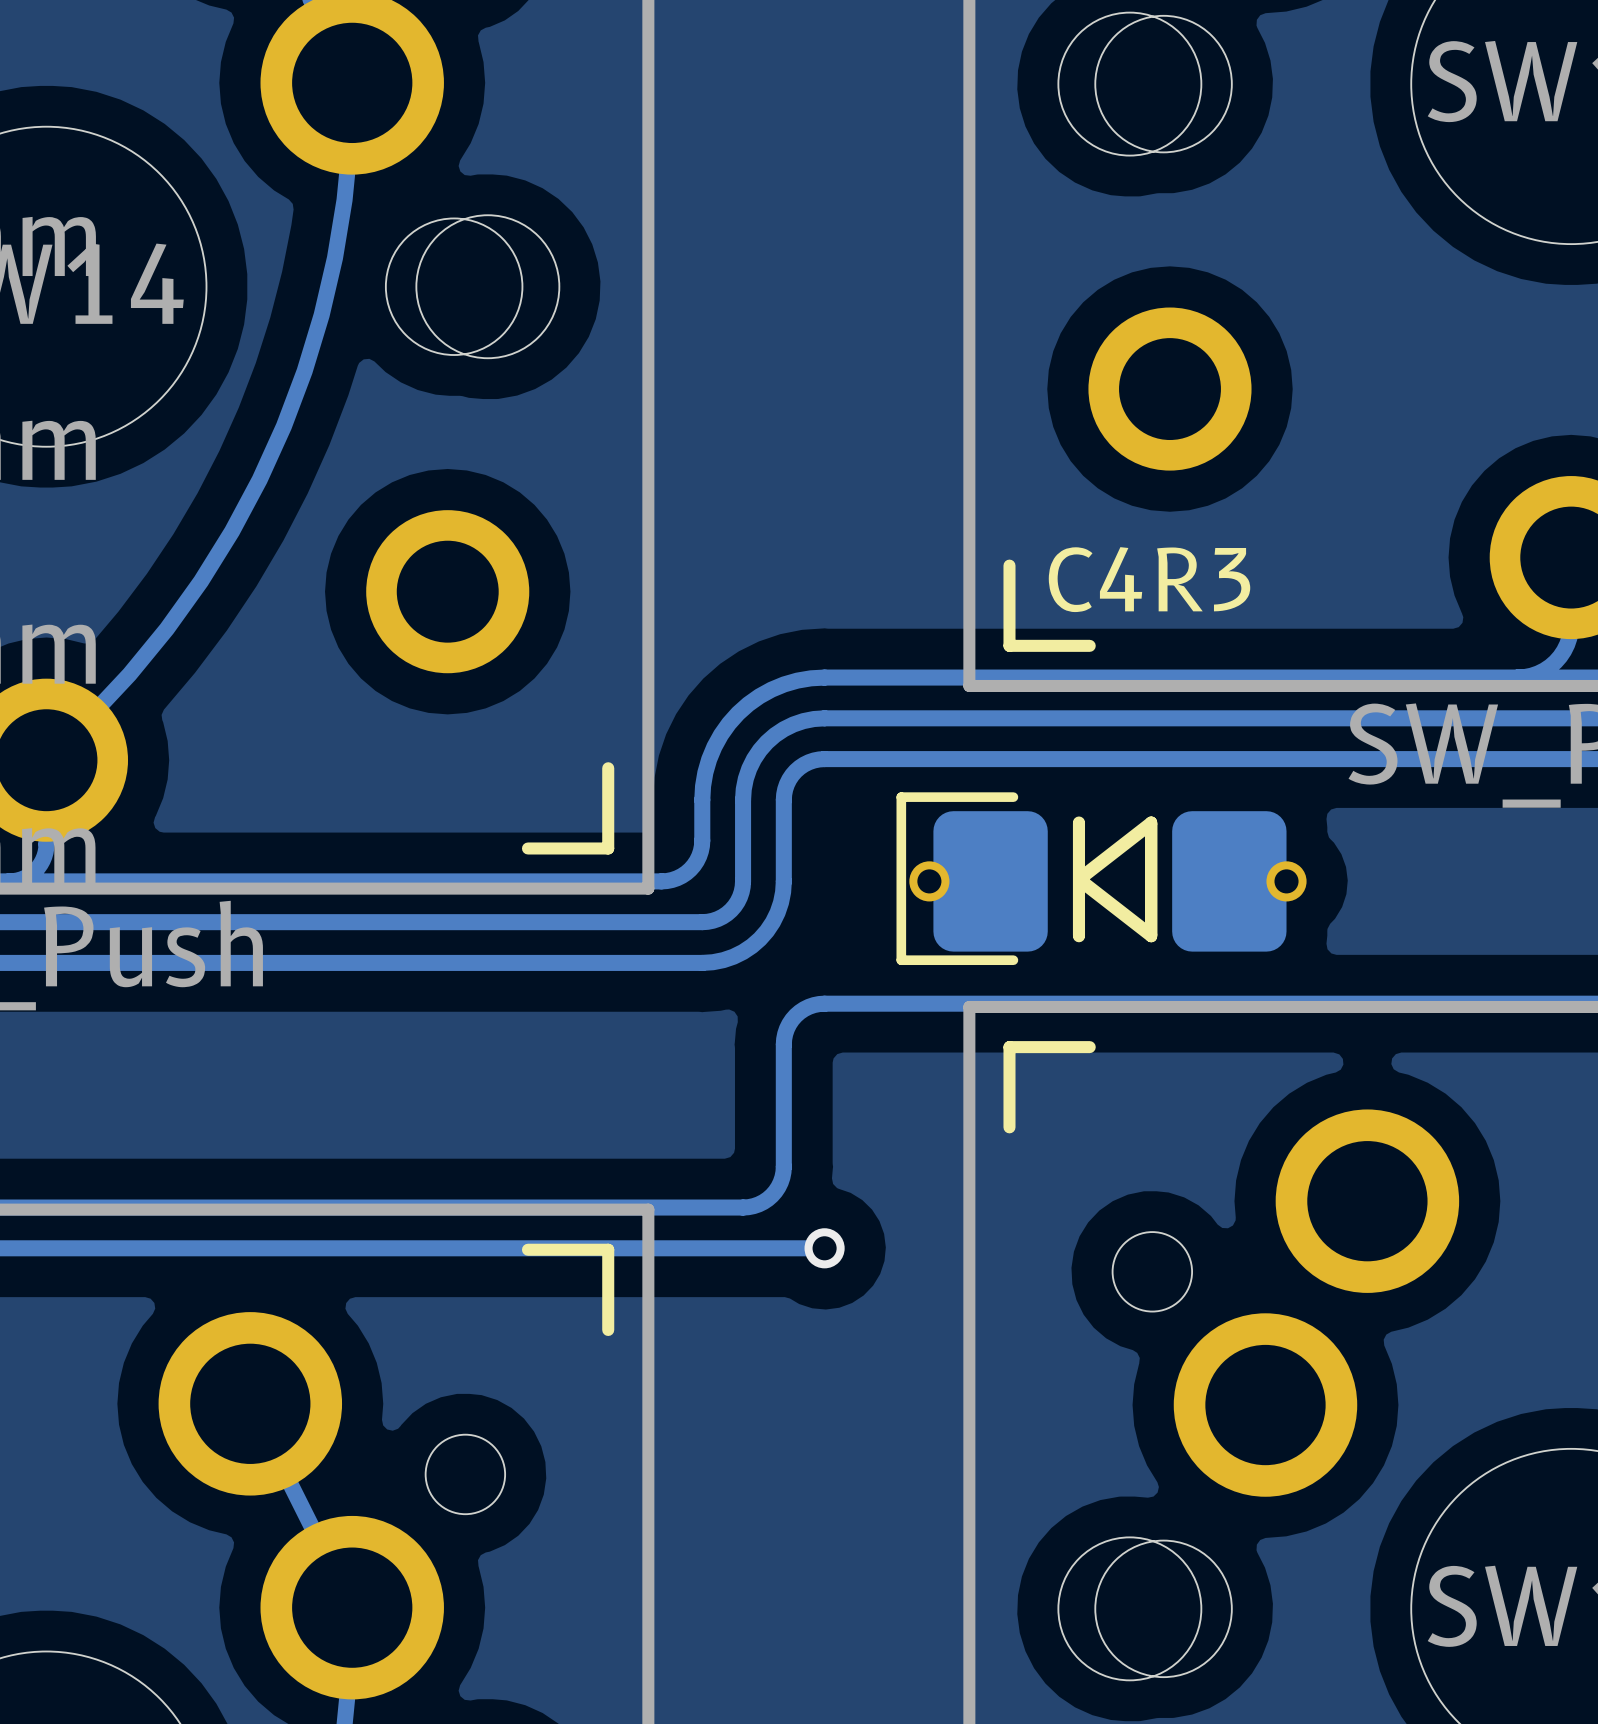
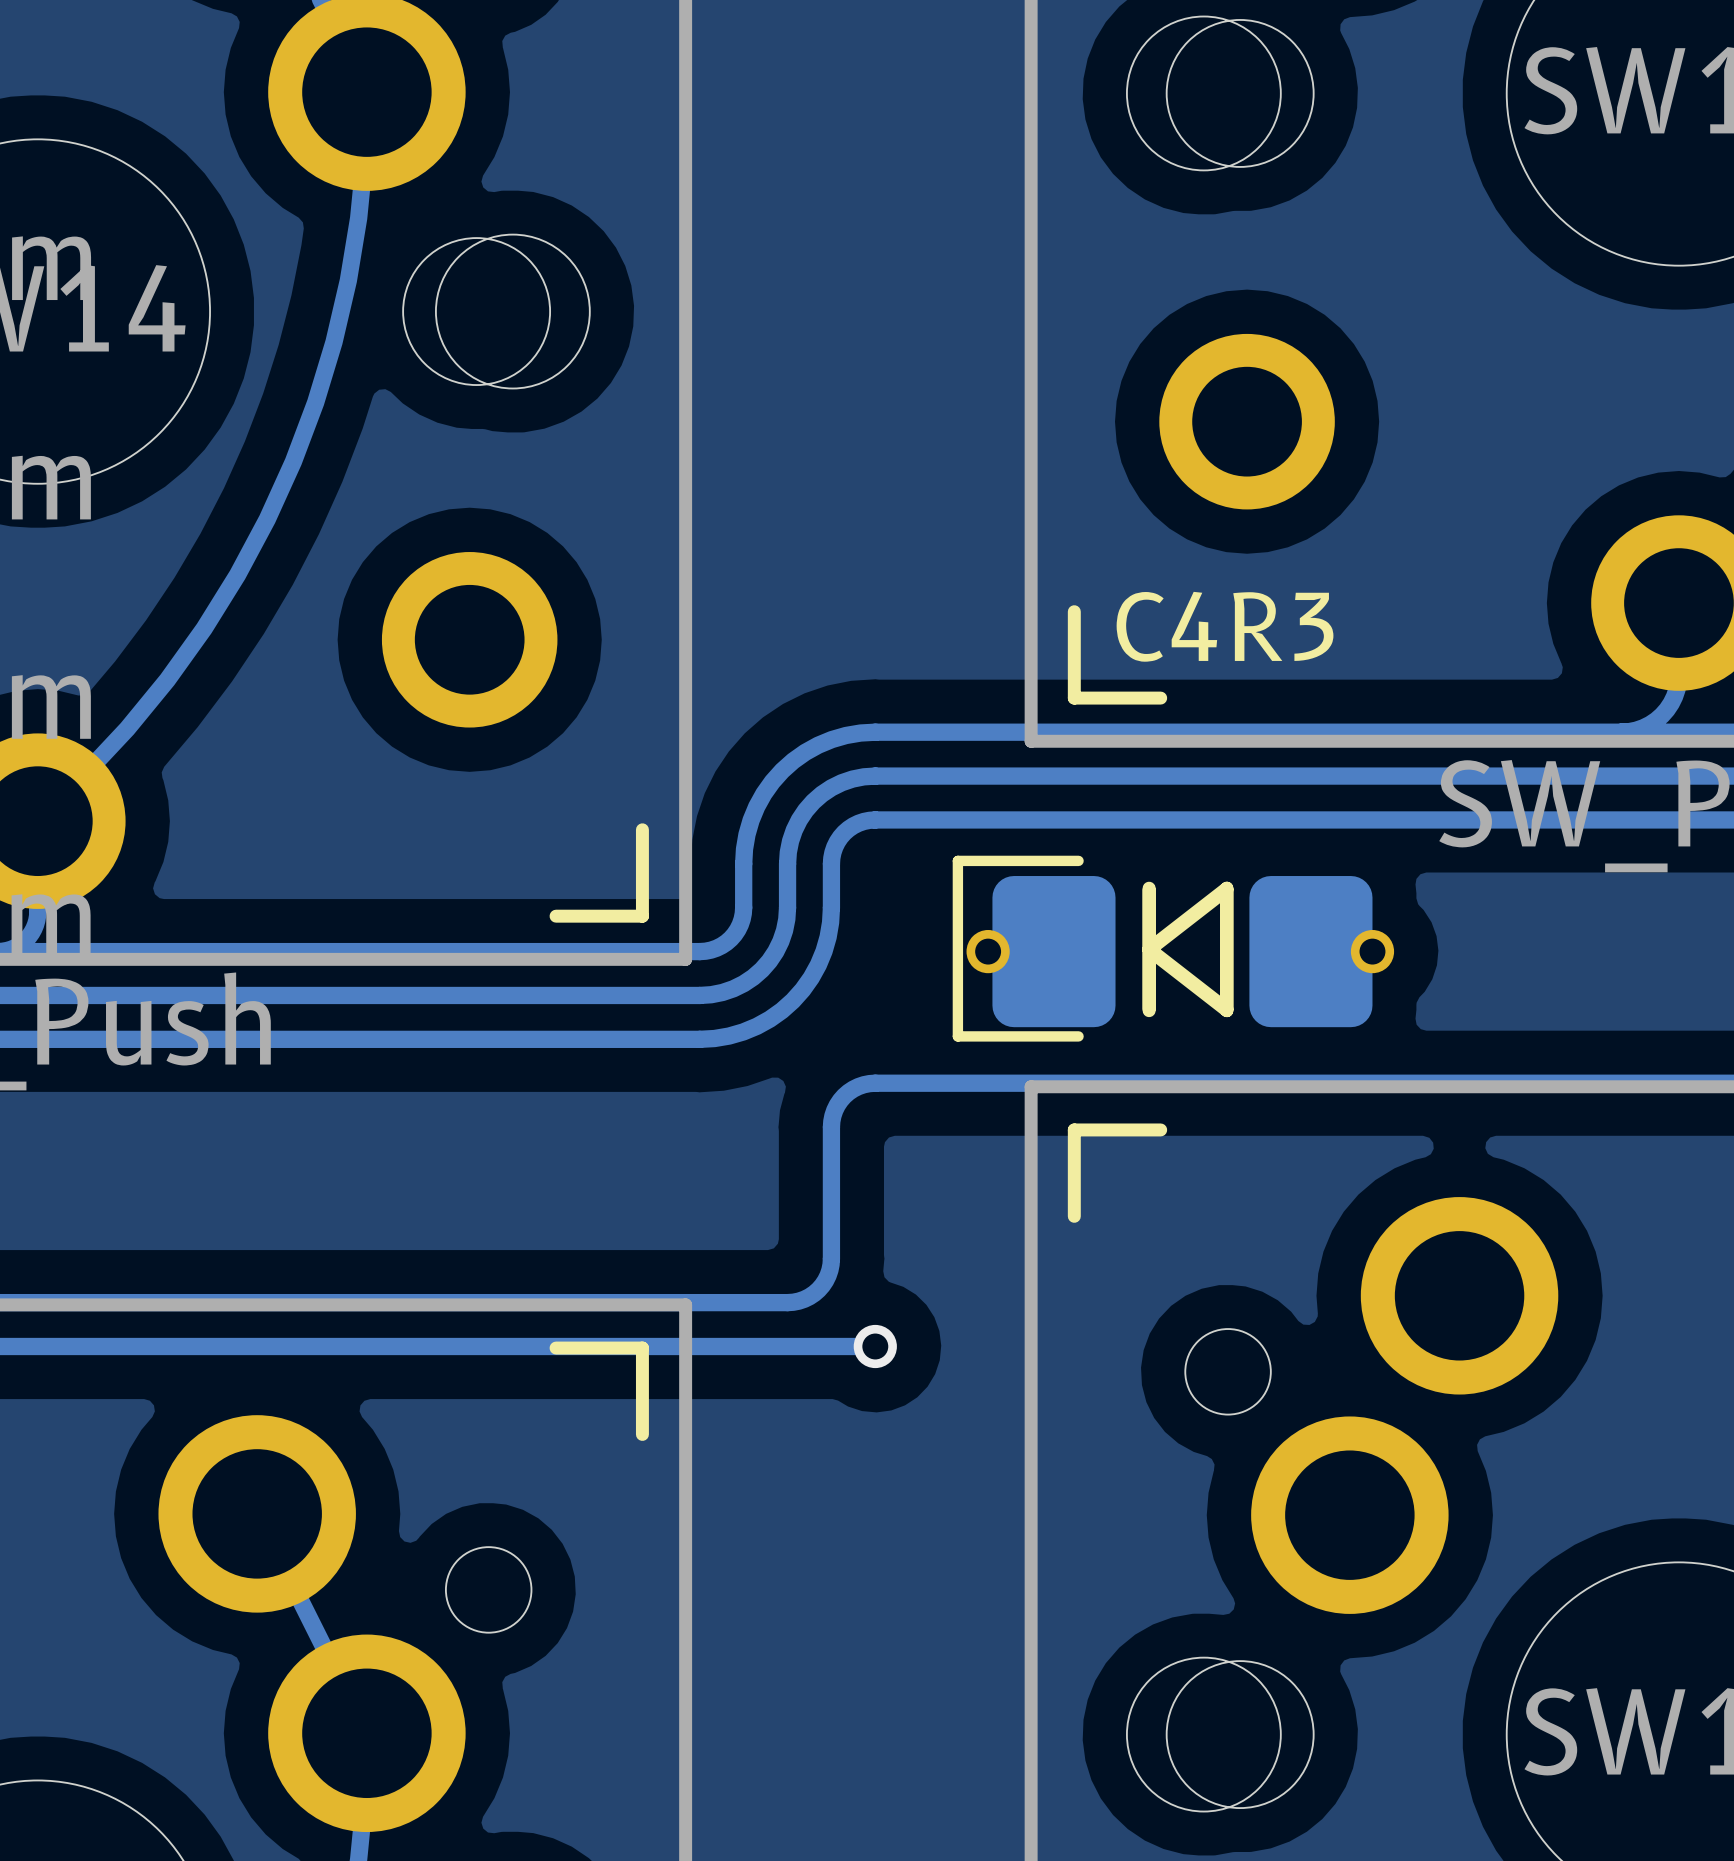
track: (743, 840) (742, 886) (737, 901) (731, 910) (717, 919) (707, 921) (661, 922) -> (787, 907) (780, 941) (761, 969) (733, 988) (699, 995)
track: (783, 840) (783, 881) (781, 902) (772, 922) (759, 939) (743, 952) (723, 960) (702, 962) (661, 962) -> (831, 907) (830, 922) (824, 951) (811, 977) (792, 1000) (769, 1019) (756, 1026) (729, 1036) (699, 1039)

